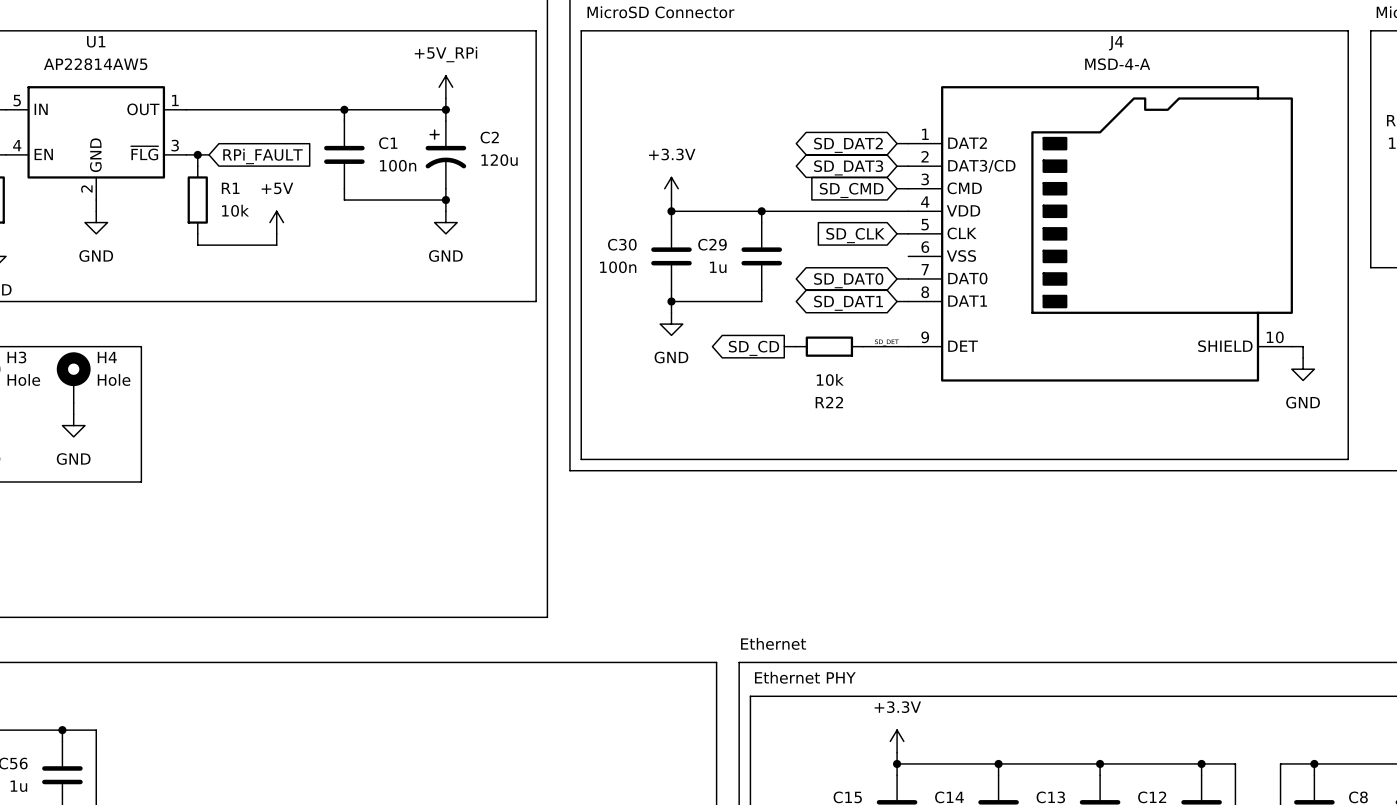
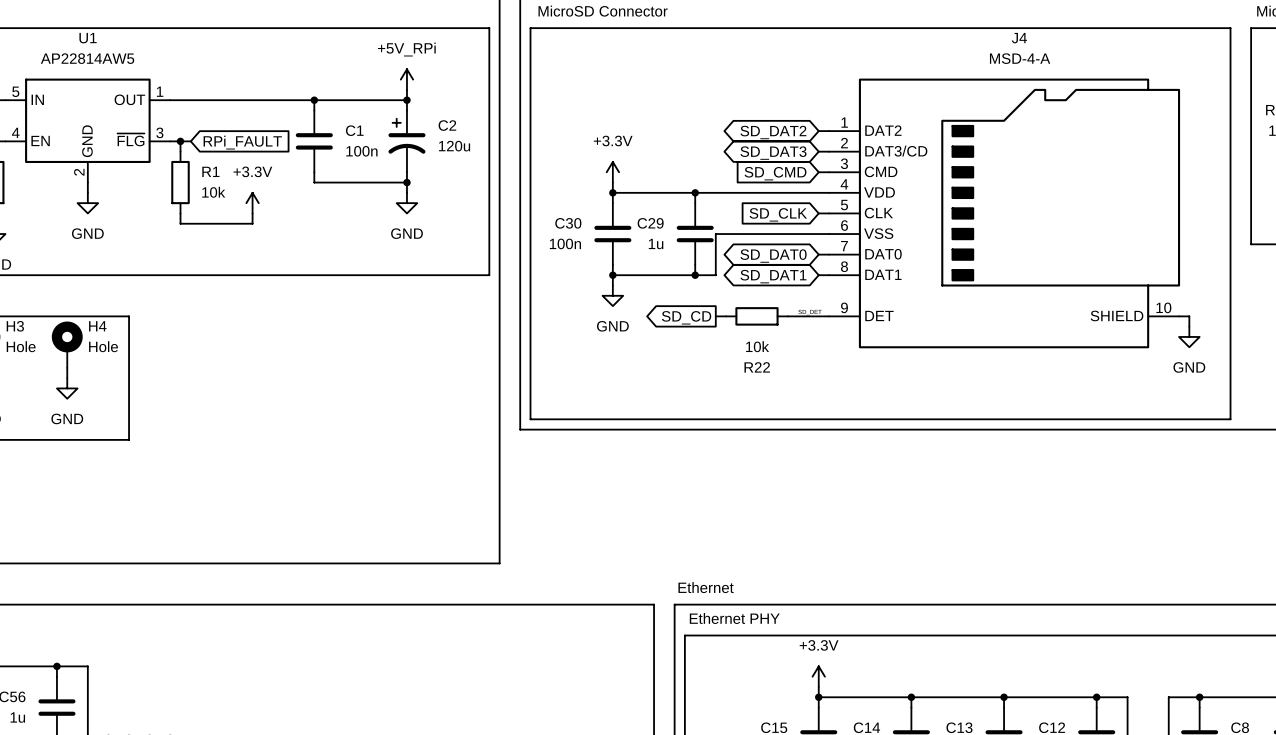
power symbol: +5V (276, 222) -> +3.3V (252, 203)
wire: none -> (829, 234) (715, 234) (715, 275) (695, 275)
junction: none -> (695, 275)

